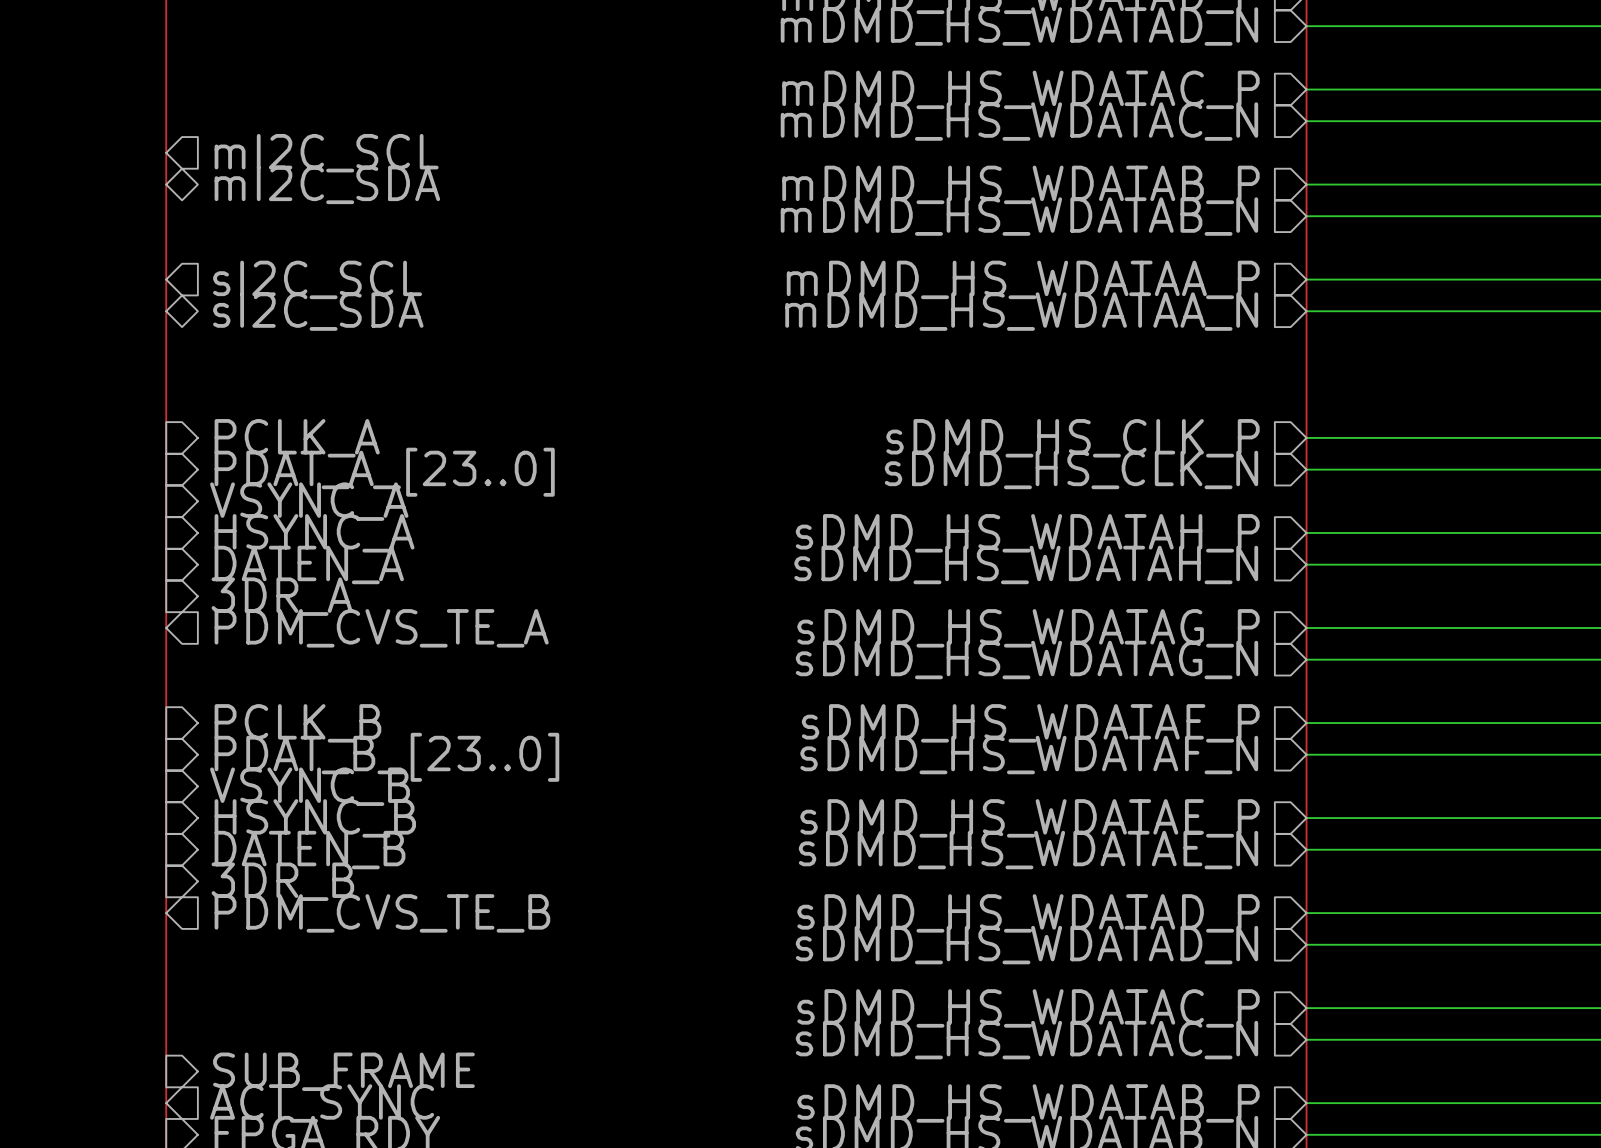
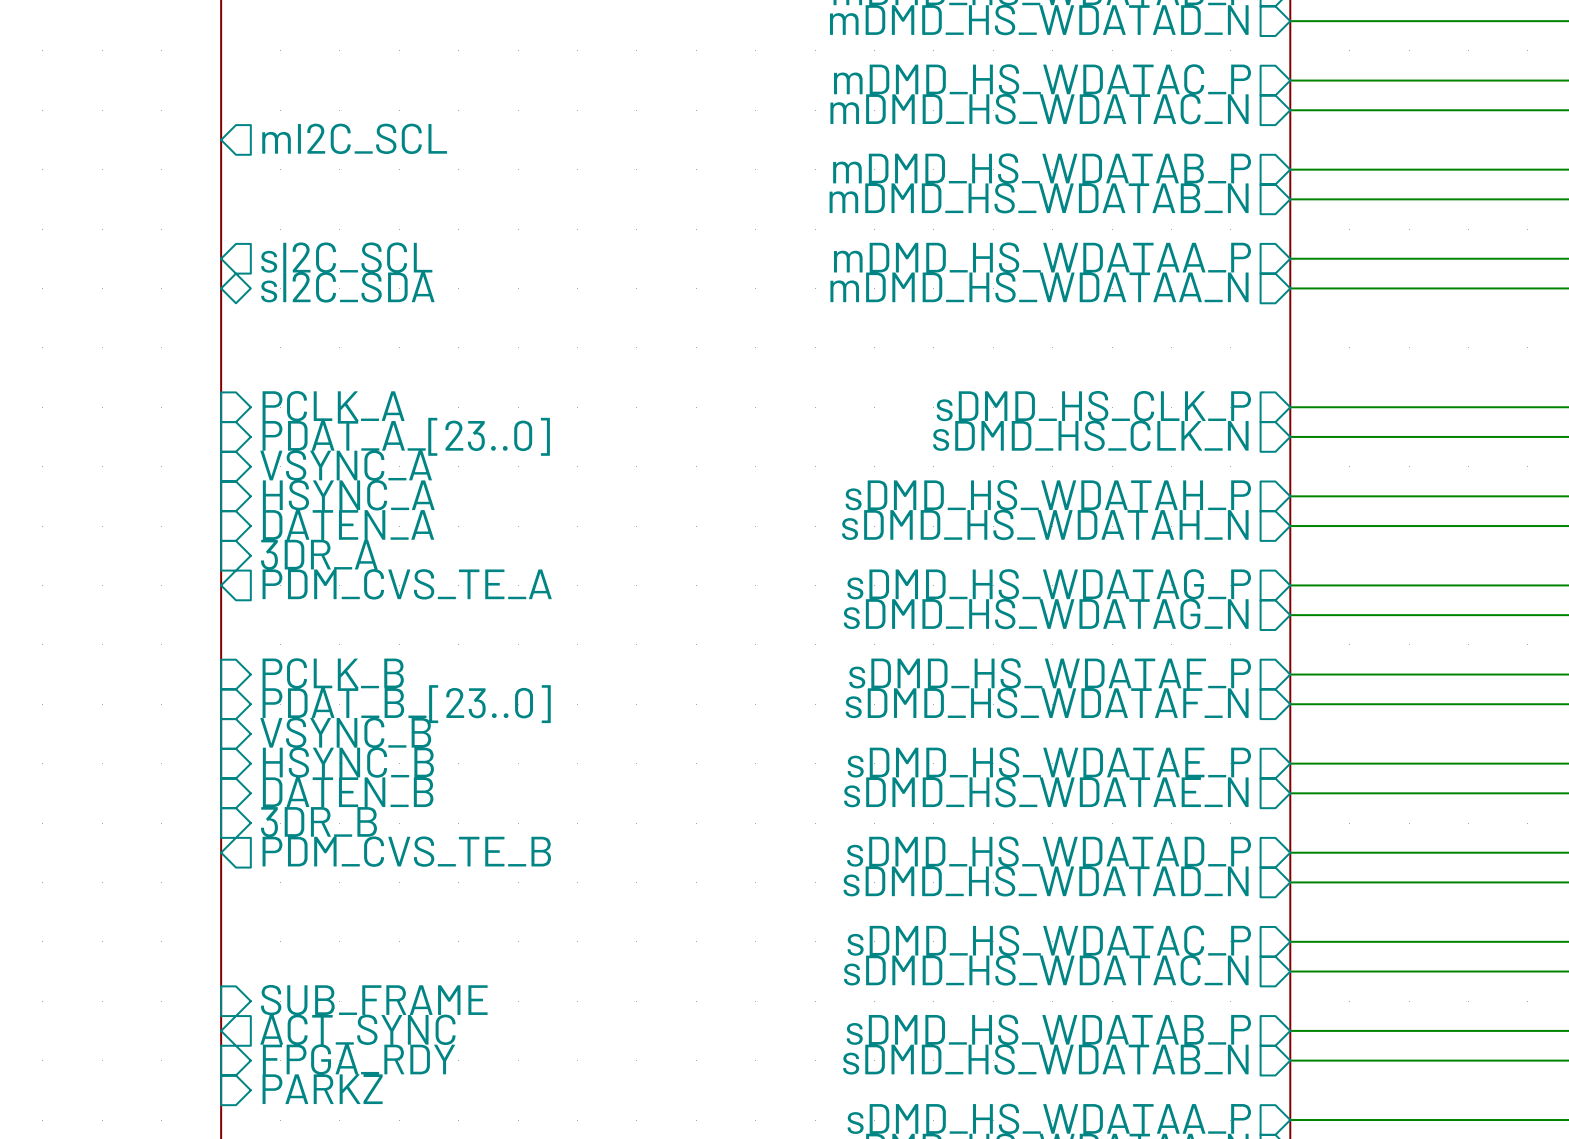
sheet pin: mI2C_SDA (327, 184) -> none

